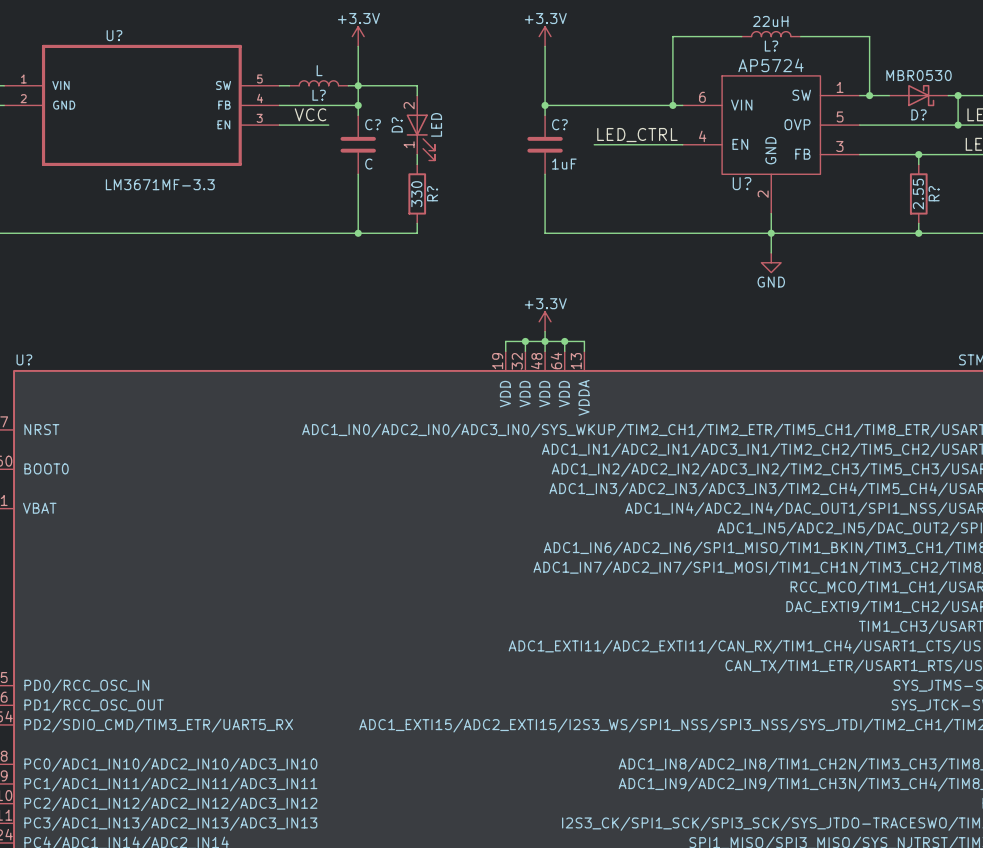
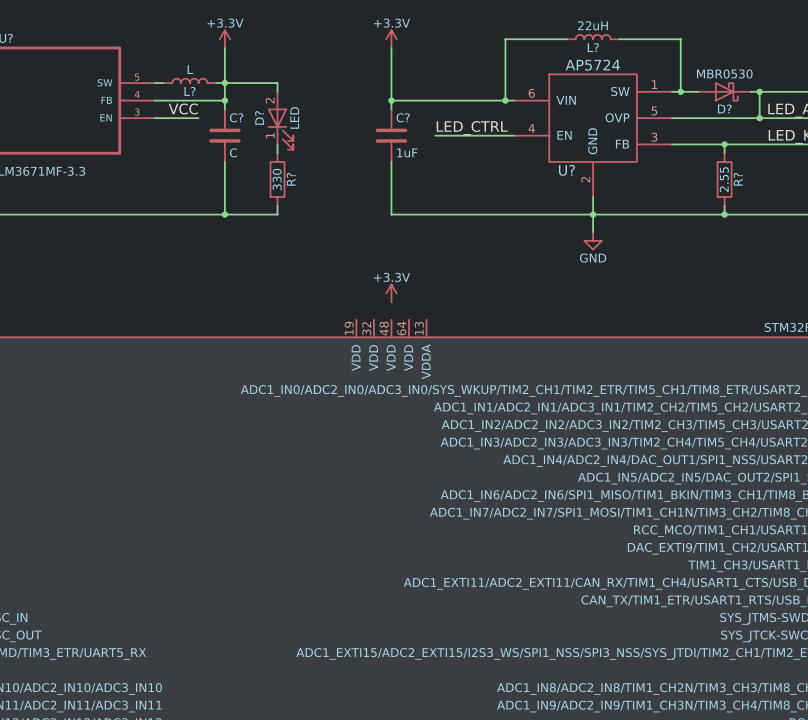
wire: (545, 331) (545, 351) -> none
wire: (525, 341) (525, 351) -> none
junction: (525, 341) -> none
junction: (545, 341) -> none
wire: (564, 341) (564, 351) -> none
junction: (564, 341) -> none
wire: (505, 351) (505, 341) (584, 341) (584, 351) -> none

